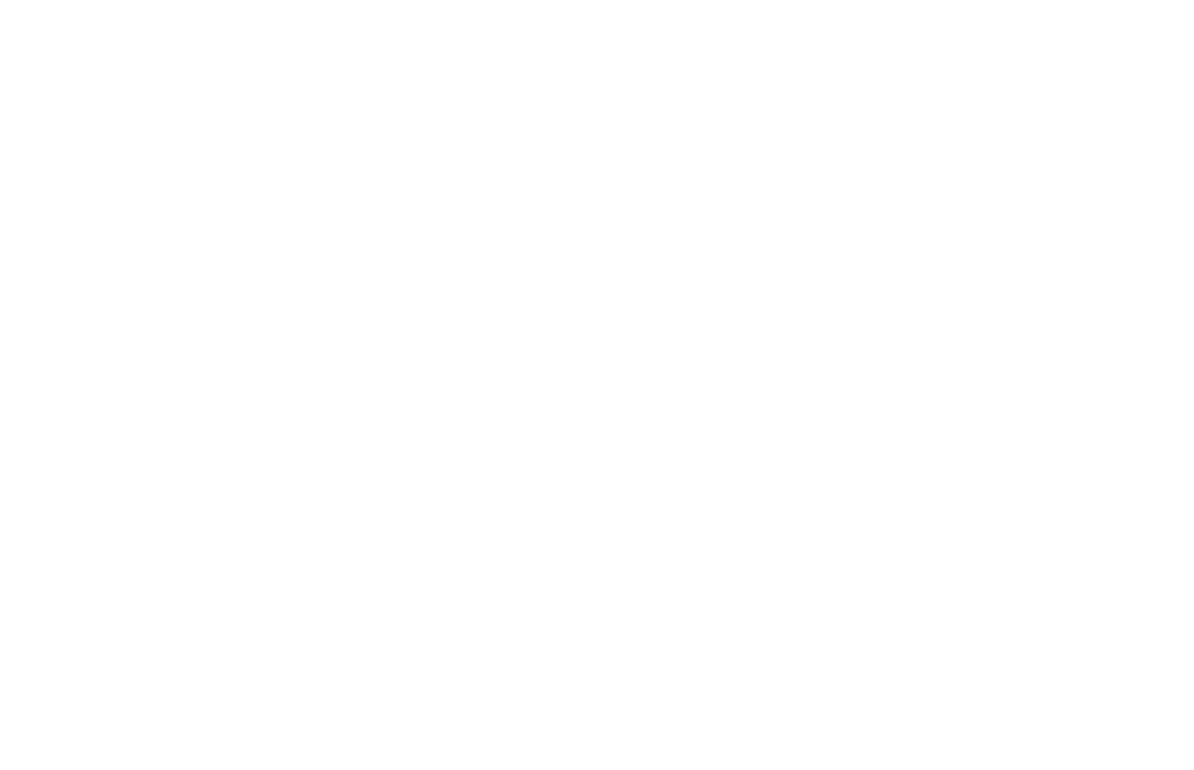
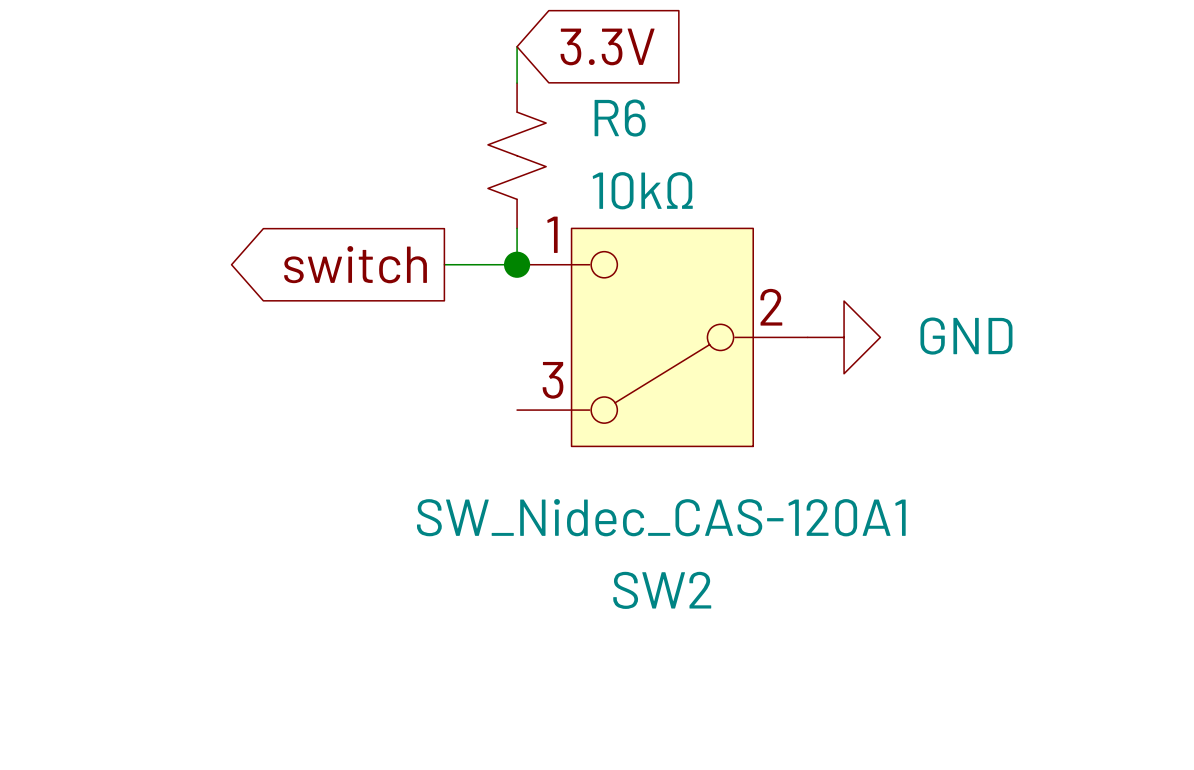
wire: none -> (517, 46) (517, 83)
global label: none -> 3.3V (607, 46)
R6: none -> 10kΩ (517, 155)
wire: none -> (517, 228) (517, 264) (444, 264)
global label: none -> switch (355, 264)
junction: none -> (517, 264)
SW2: none -> SW_Nidec_CAS-120A1 (662, 337)
power symbol: none -> GND (844, 337)

